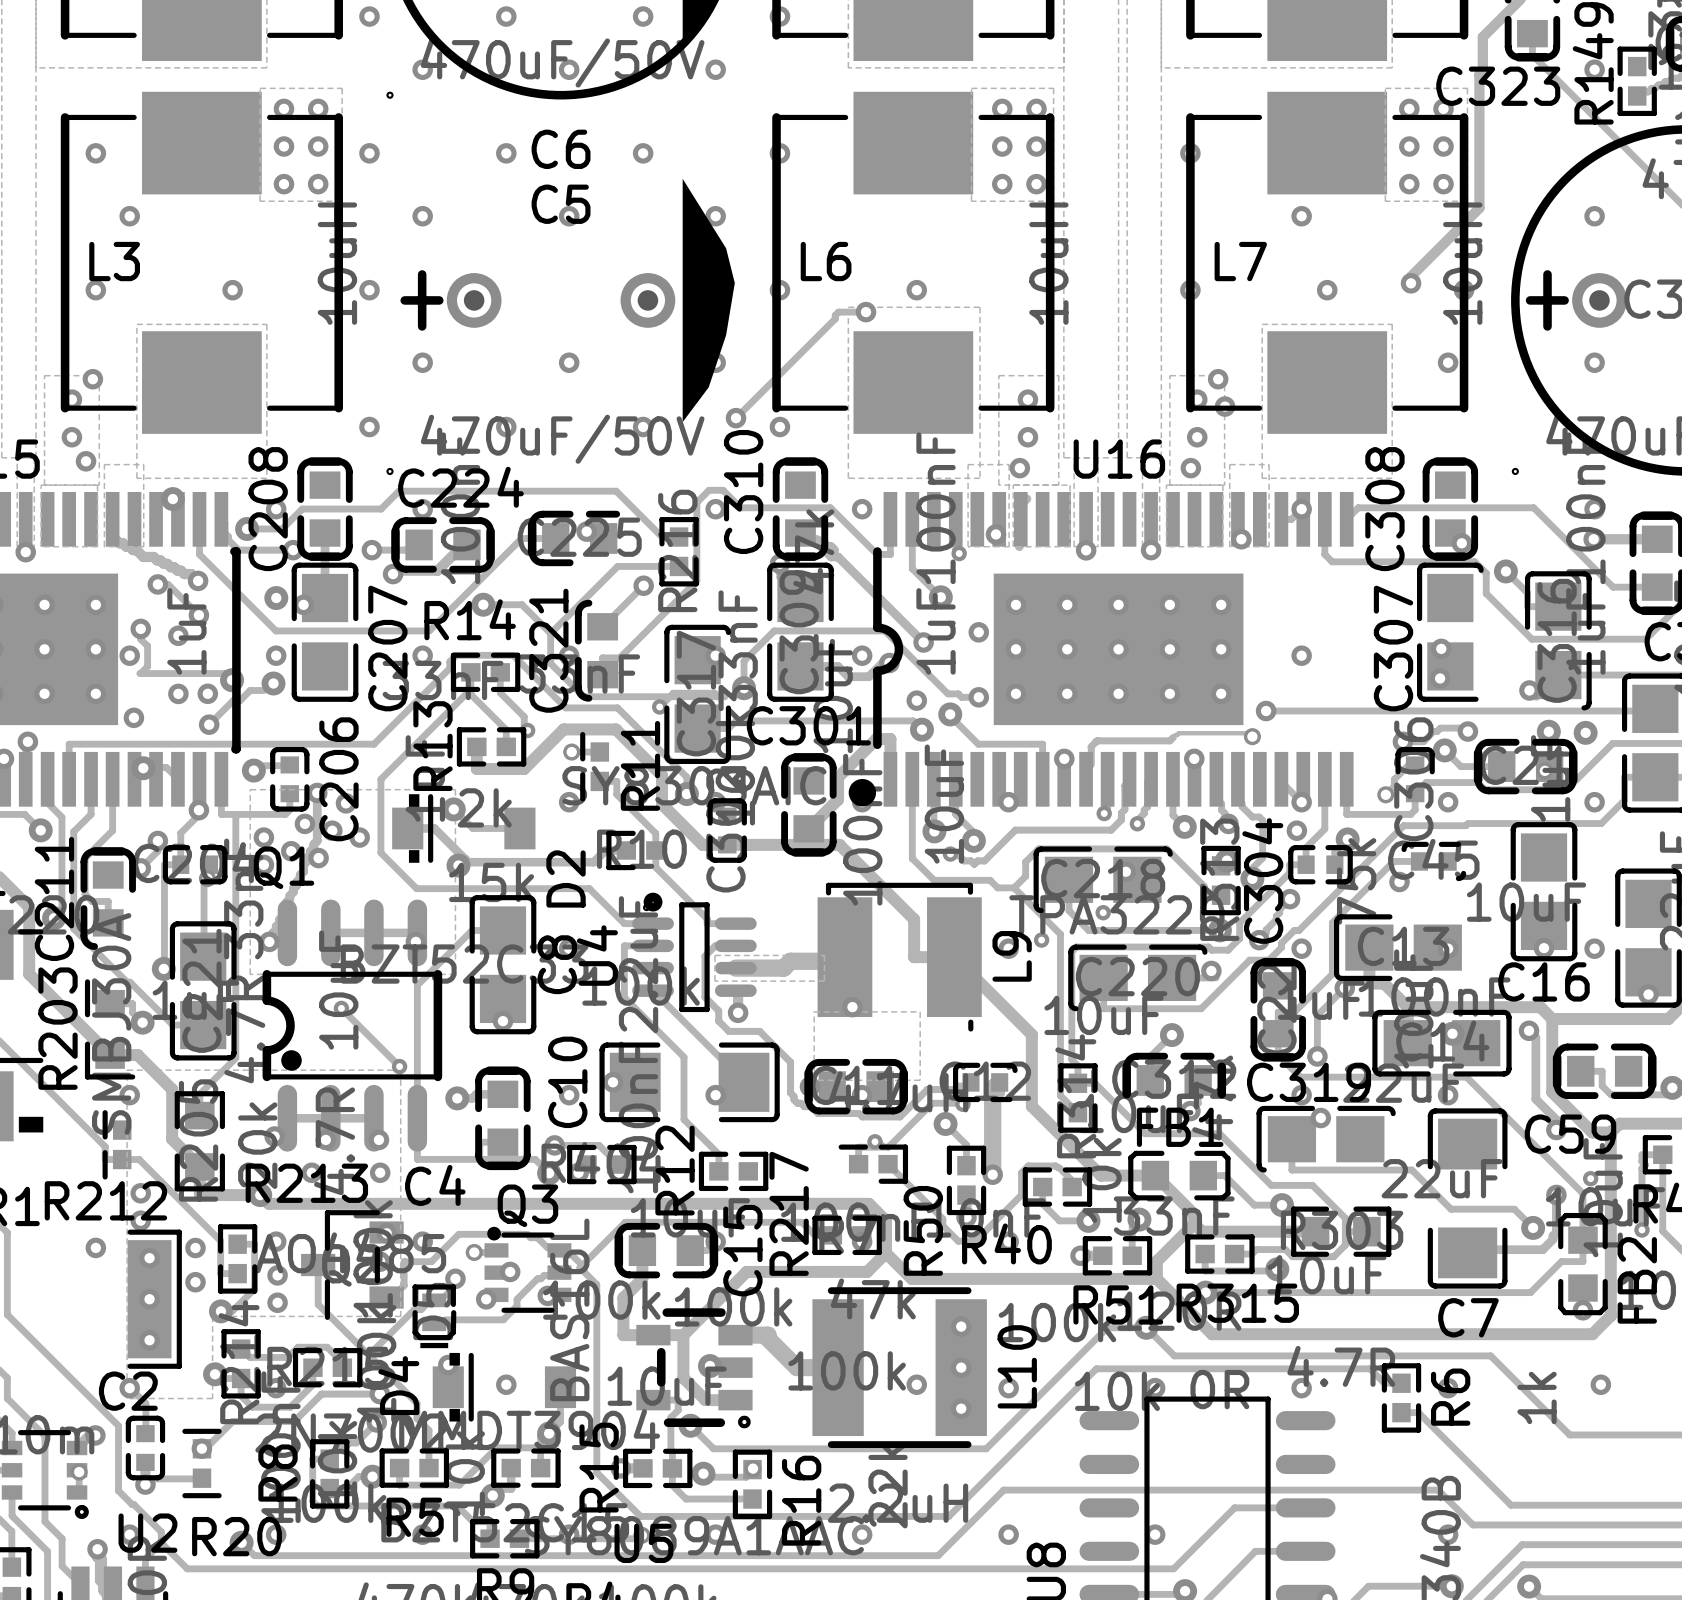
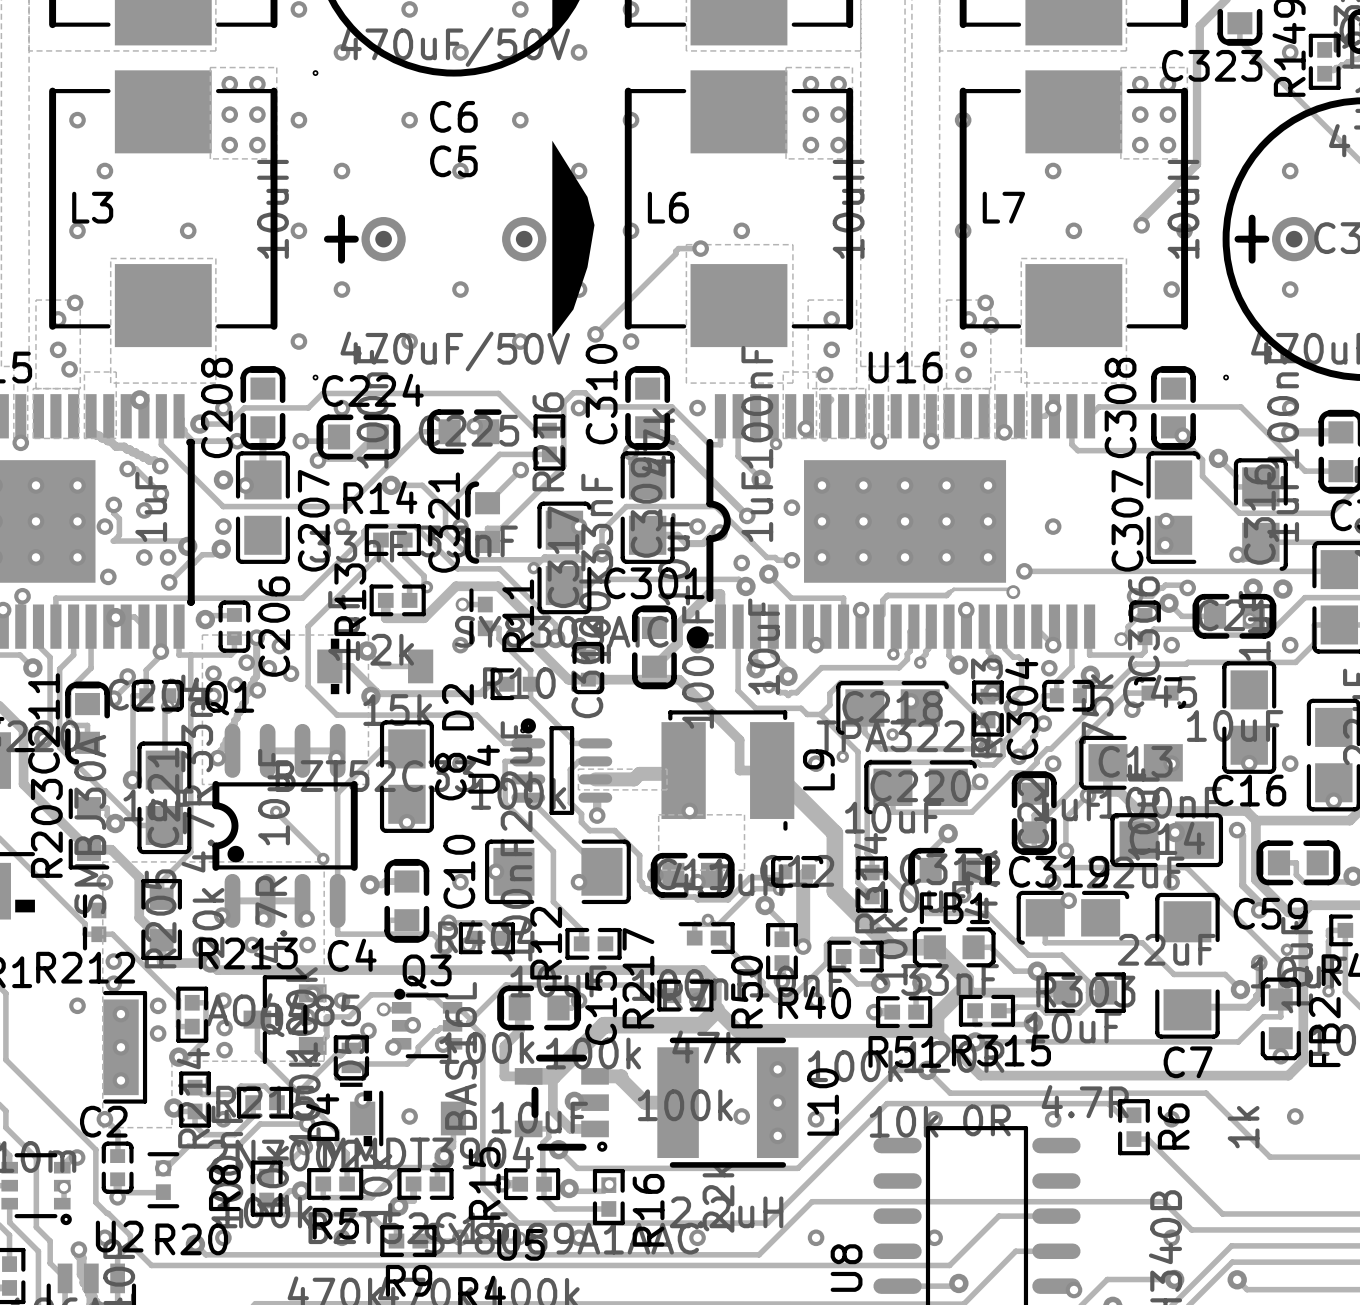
track width: thin (954, 957) (1031, 1034) (1031, 1106) (1101, 1175) (1155, 1175) (1194, 1214) (1194, 1223) (1156, 1261) (1156, 1278) (911, 1278) (885, 1253) (867, 1271) (746, 1271) (683, 1335) (653, 1335) -> thick (772, 770) (834, 833) (834, 891) (890, 947) (934, 947) (966, 978) (966, 986) (936, 1016) (936, 1030) (737, 1030) (716, 1010) (701, 1025) (604, 1025) (552, 1076) (528, 1076)

